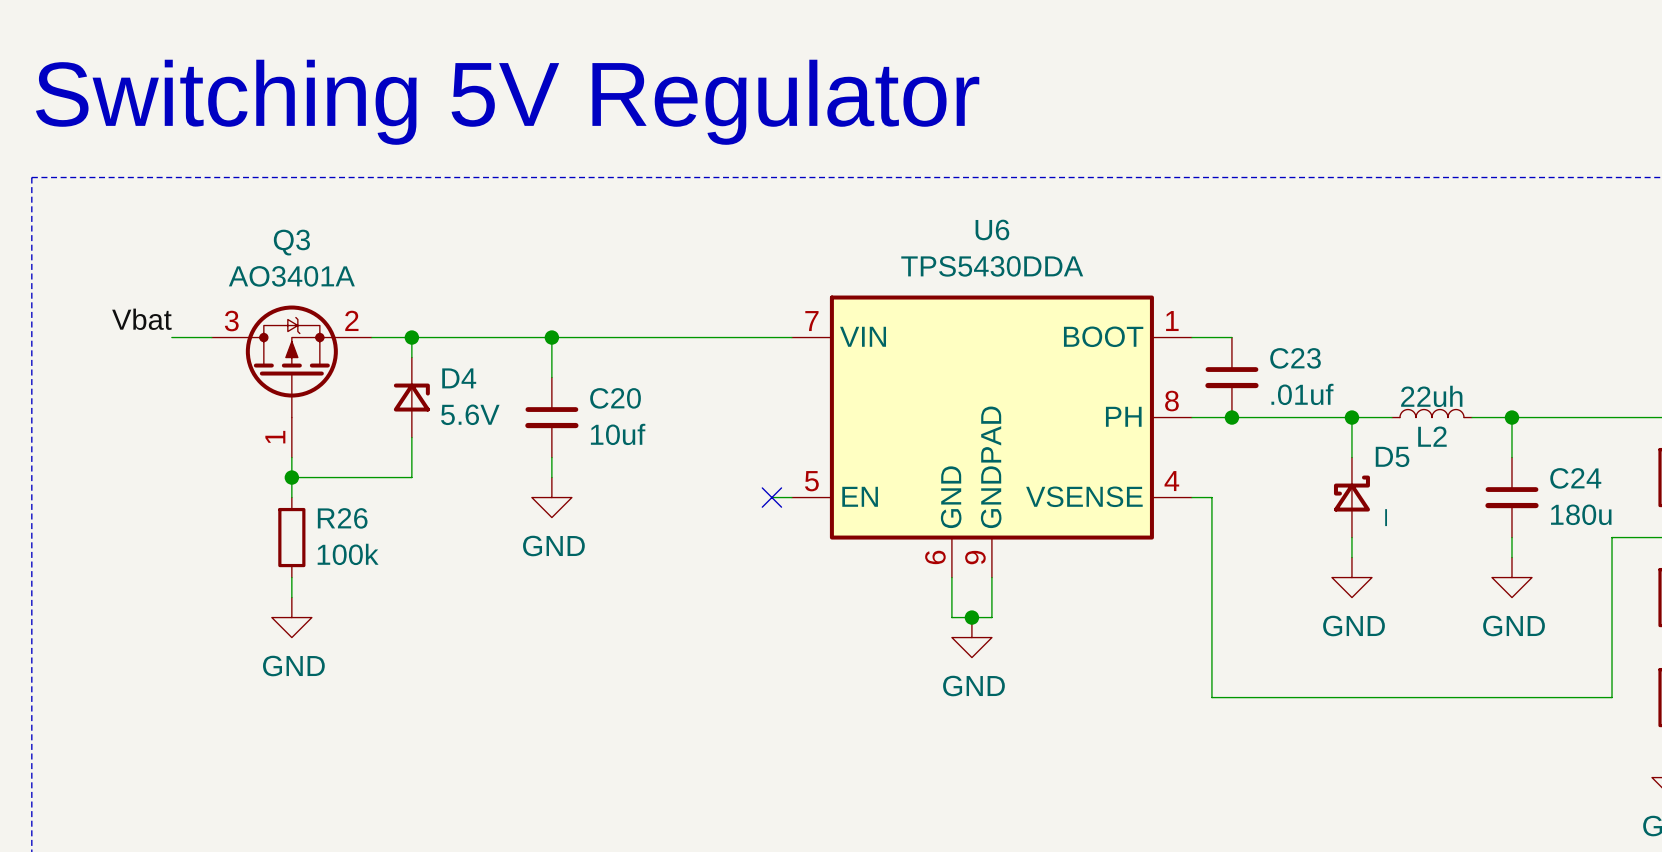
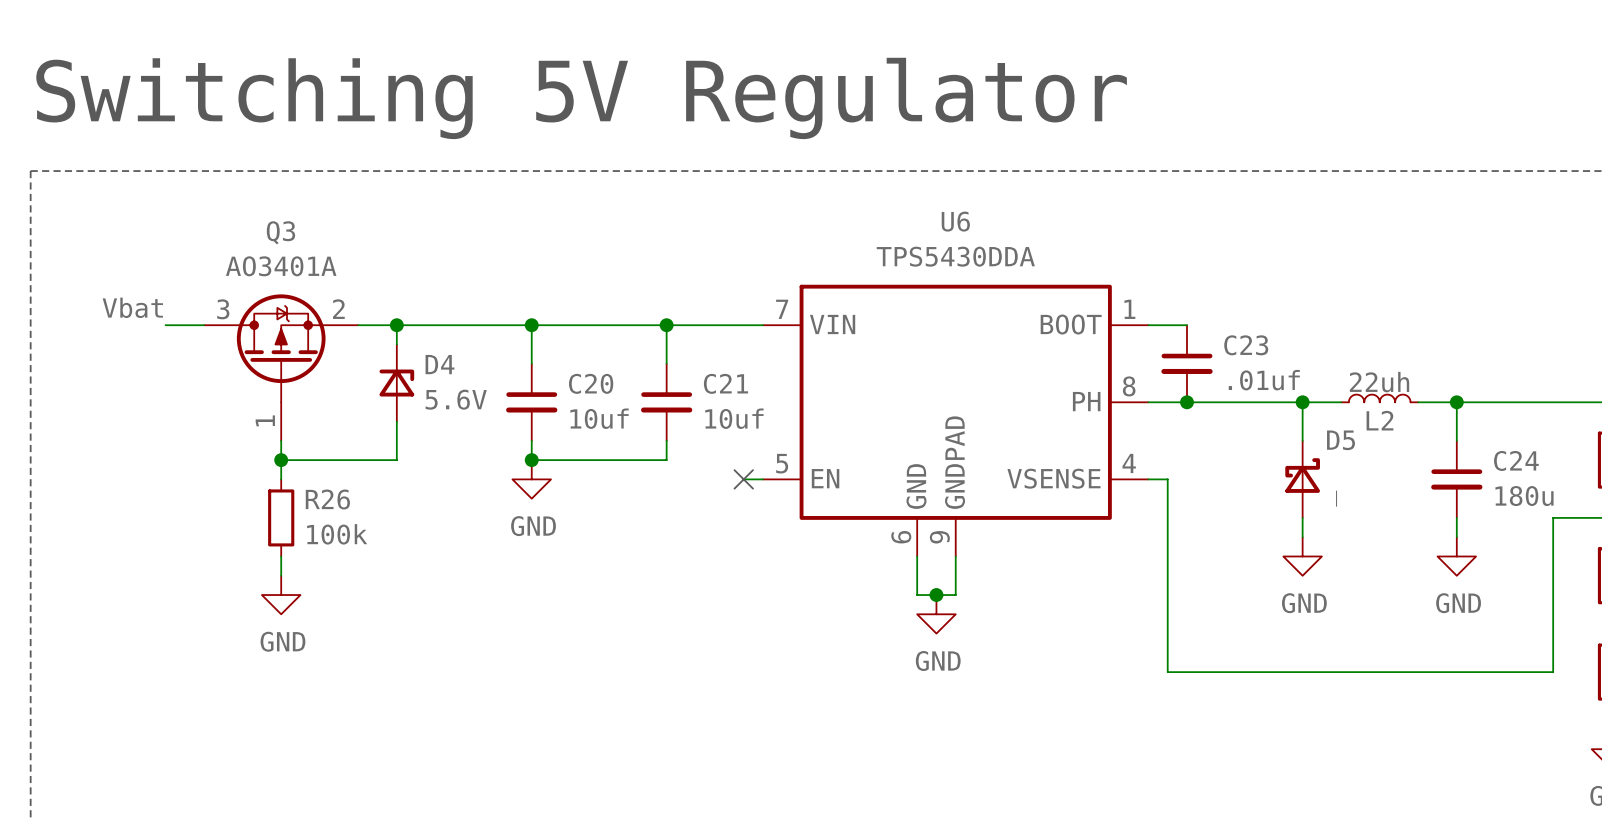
wire: none -> (666, 325) (666, 363)
junction: none -> (666, 325)
C21: none -> 10uf (666, 402)
wire: none -> (666, 440) (666, 460) (531, 460)
junction: none -> (531, 460)

